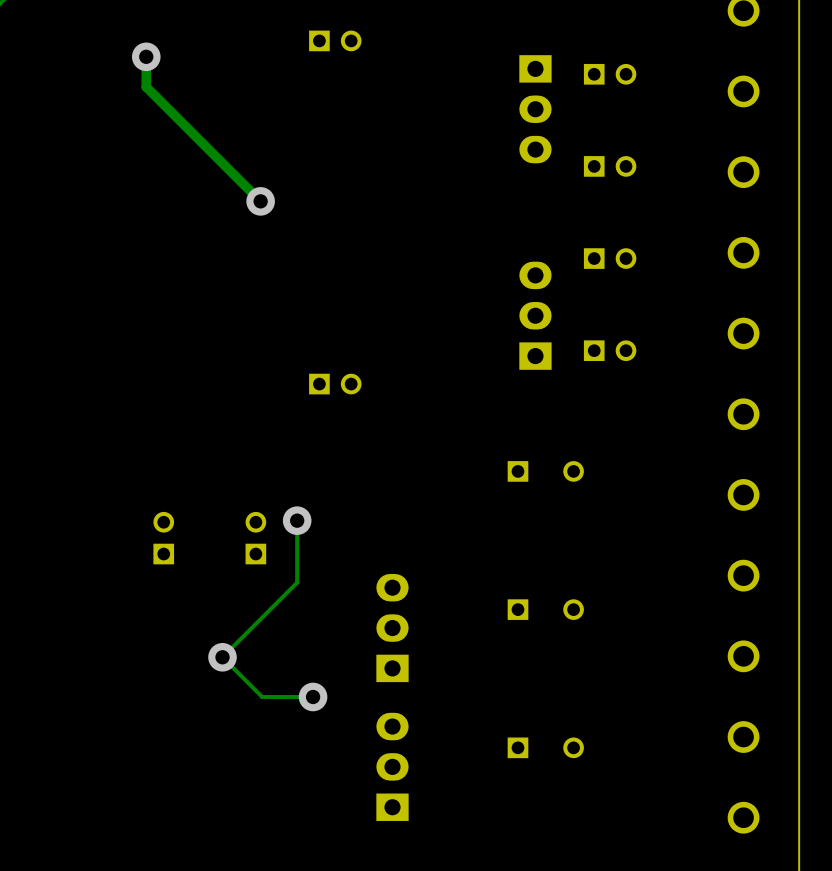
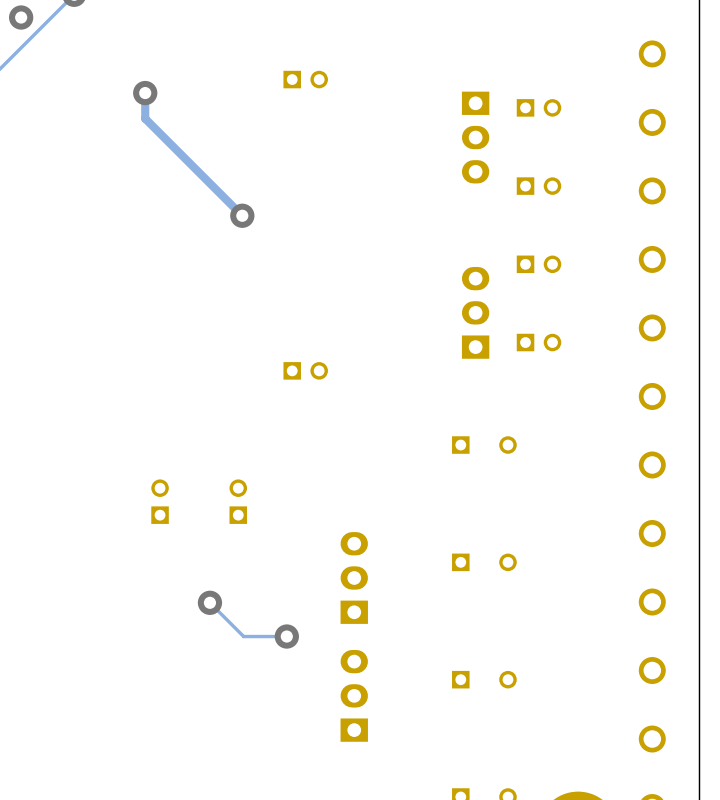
track: (297, 520) (297, 582) (222, 657) -> none
via: (297, 520) -> none

